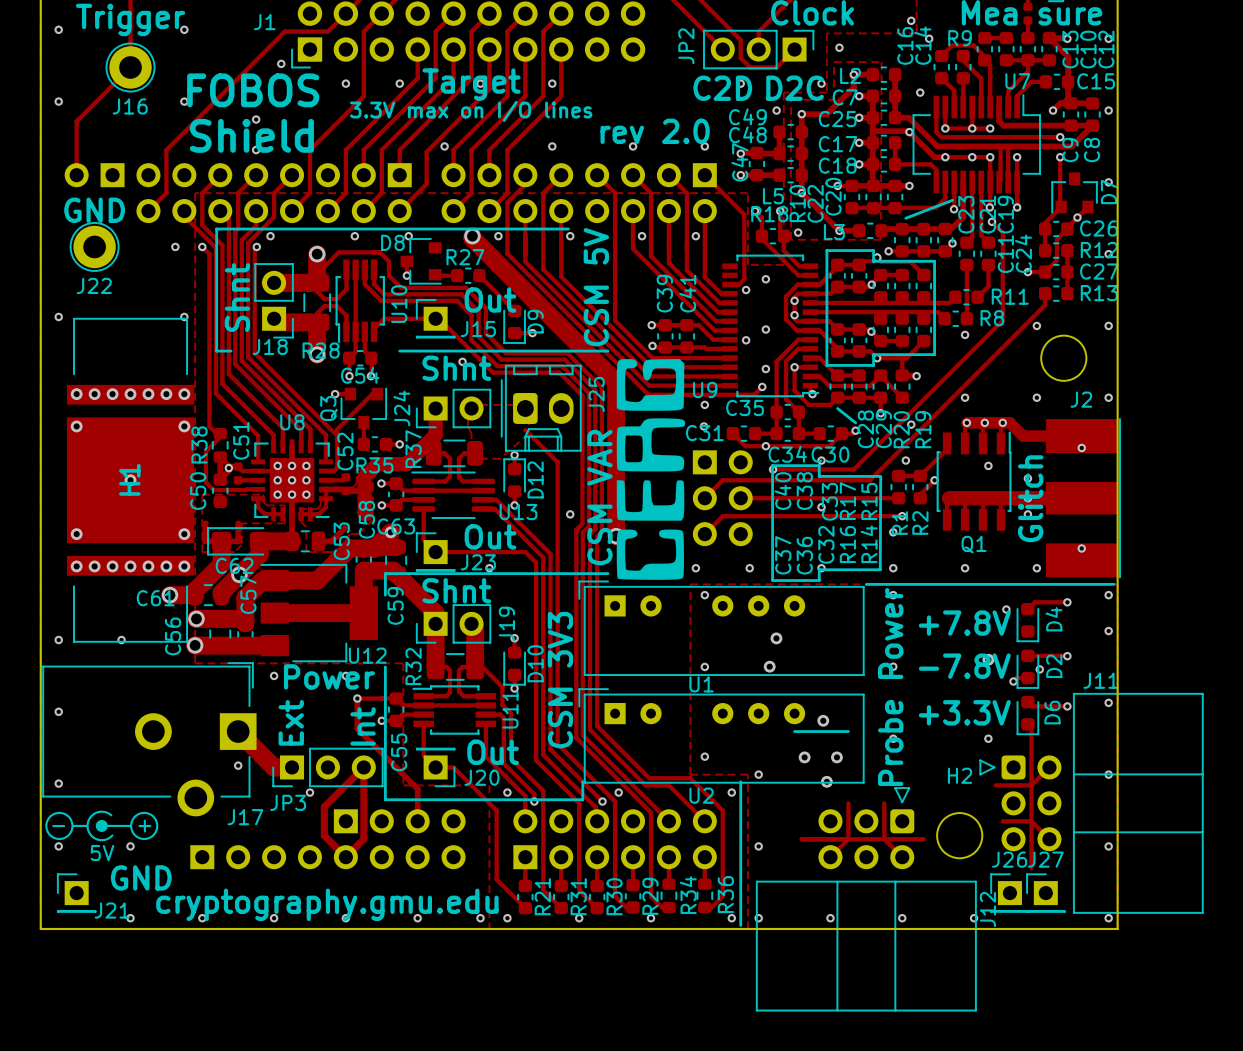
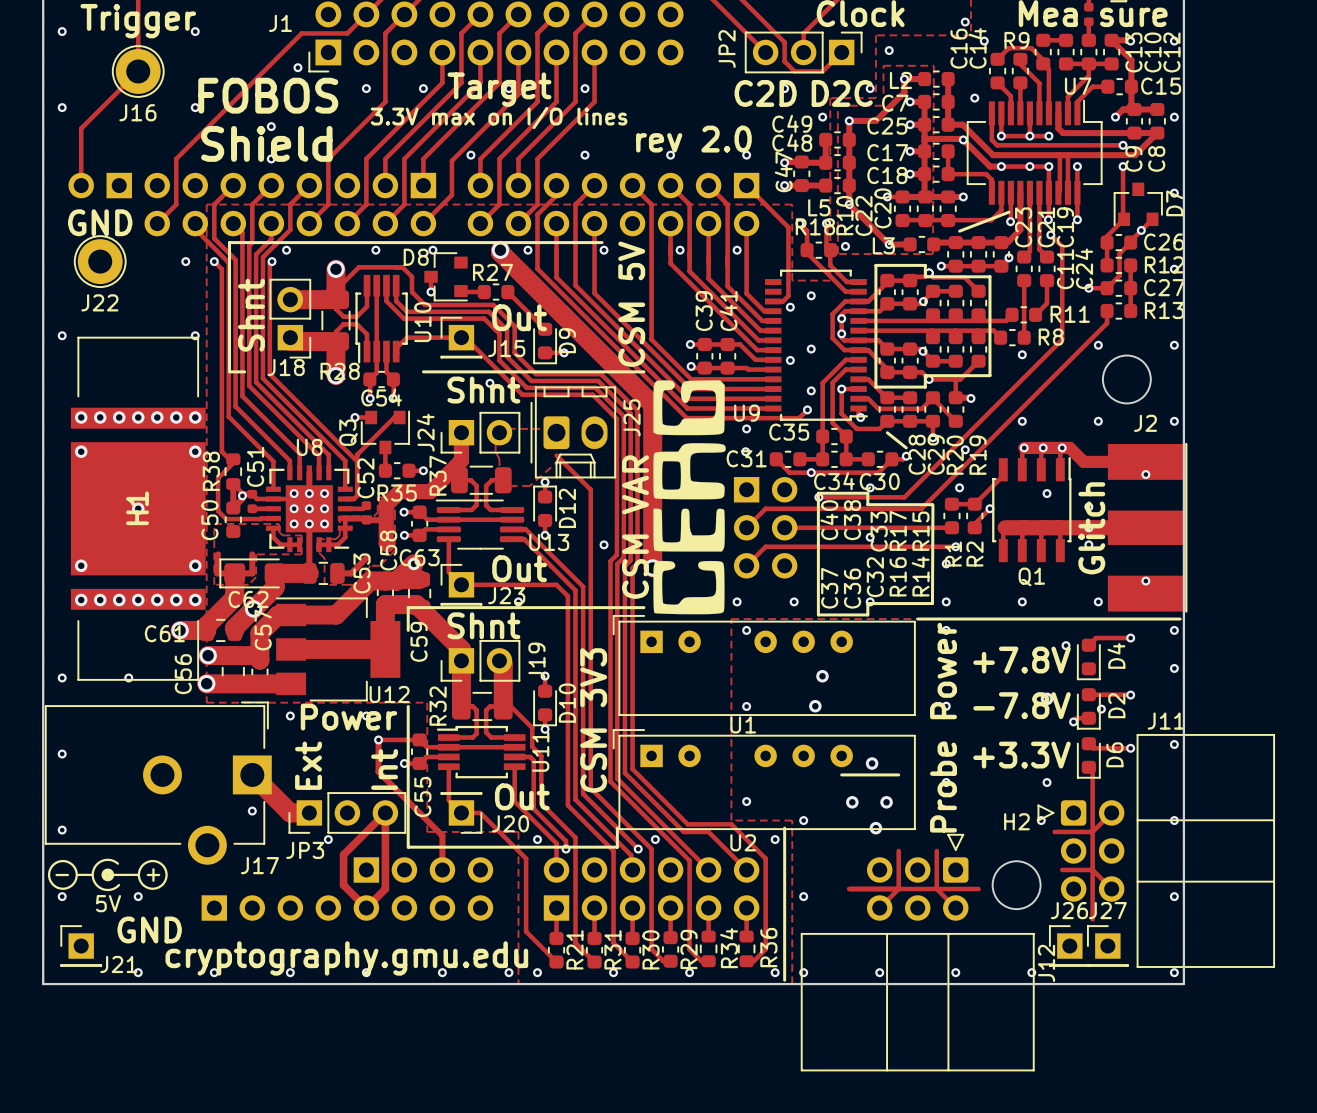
via: none -> (1041, 820)

